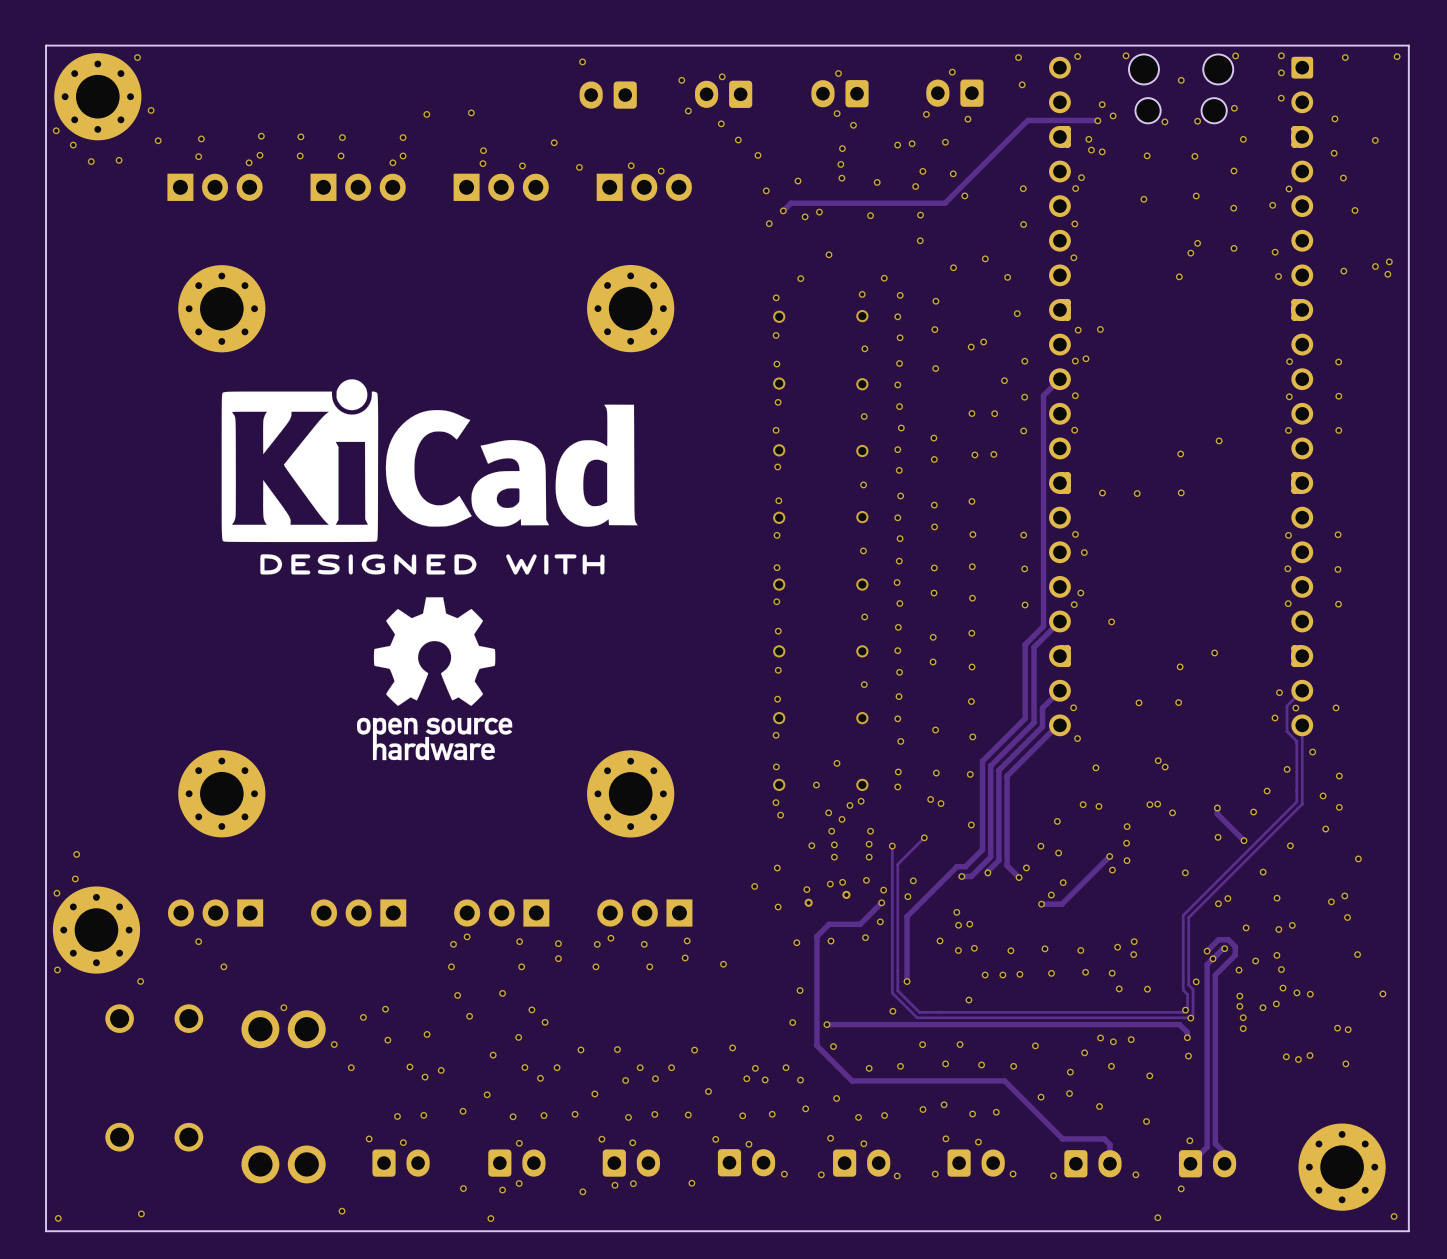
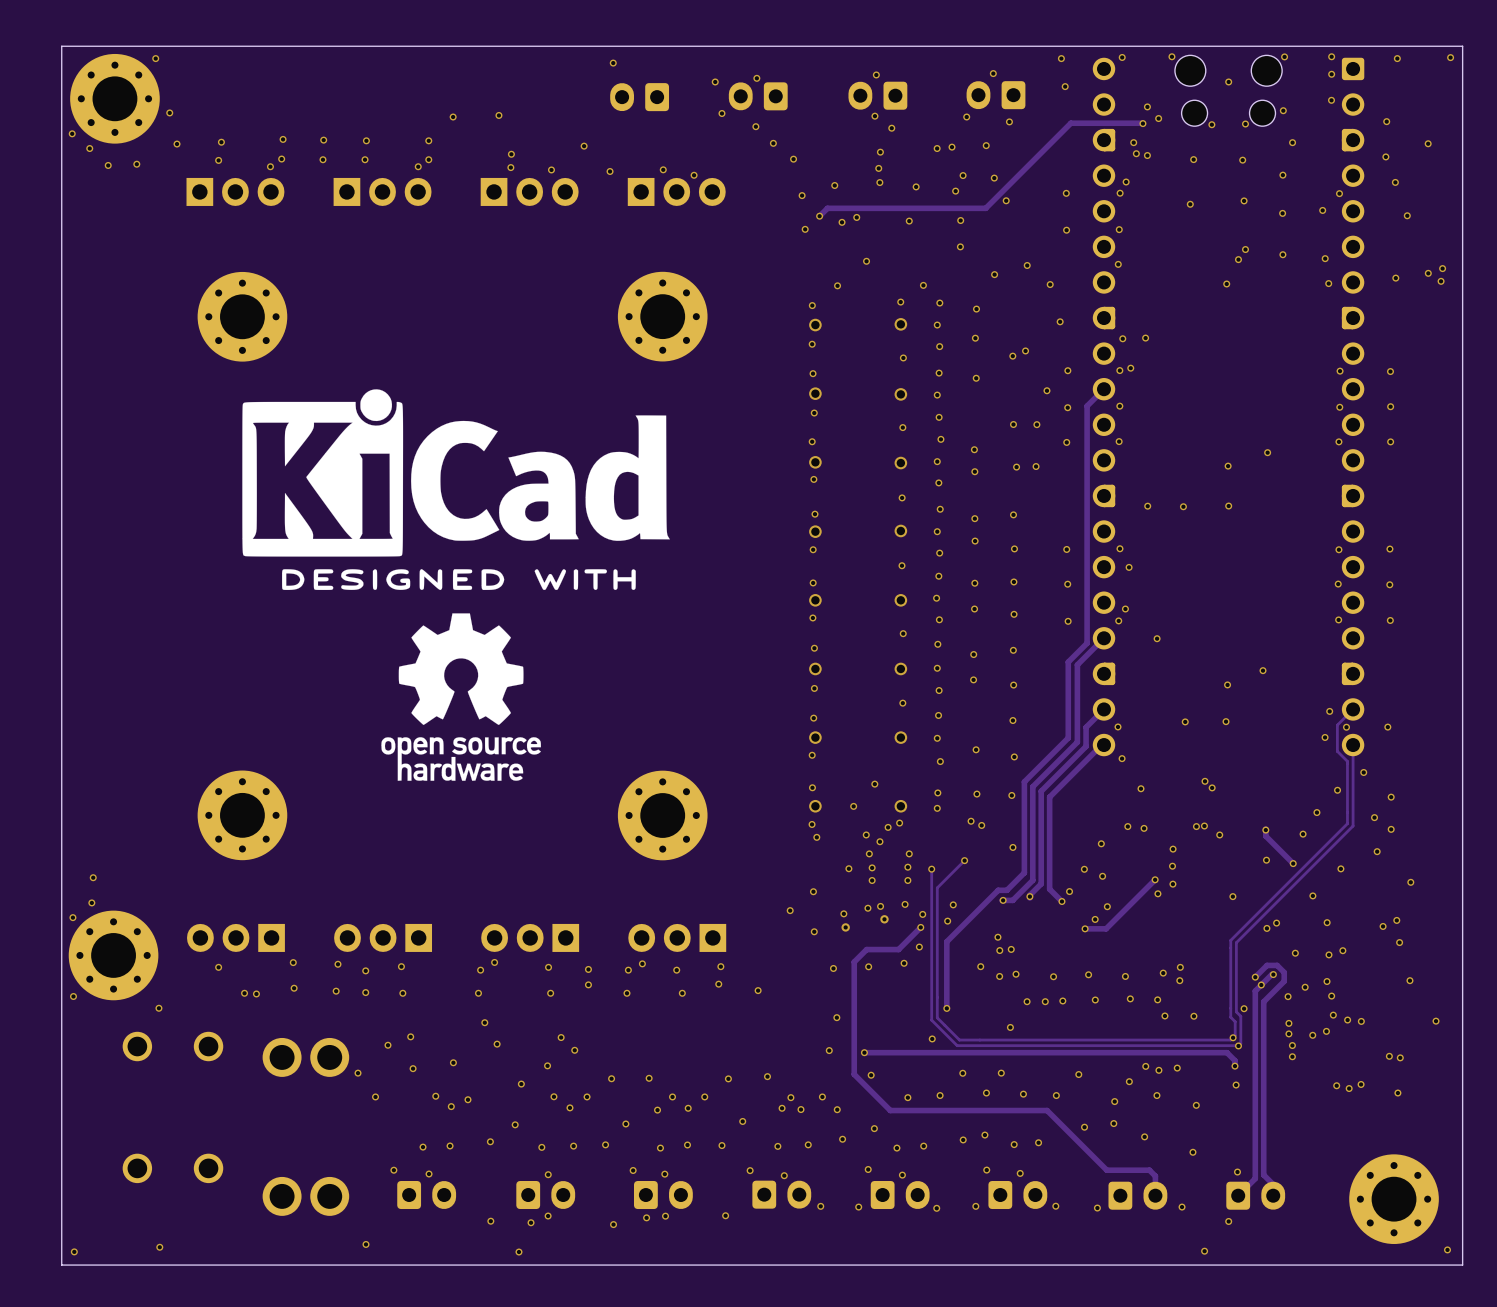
via: none -> (293, 962)
via: none -> (337, 964)
via: none -> (401, 966)
via: none -> (365, 970)
via: none -> (294, 988)
via: none -> (336, 991)
via: none -> (365, 992)
via: none -> (402, 993)
via: none -> (256, 993)
via: (502, 993) -> none
via: (283, 1007) -> none

